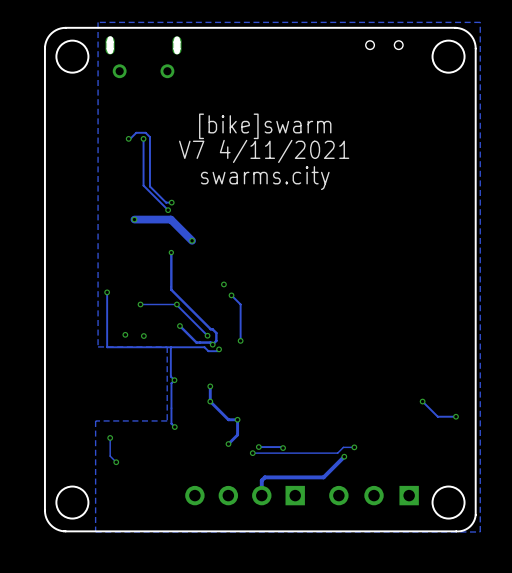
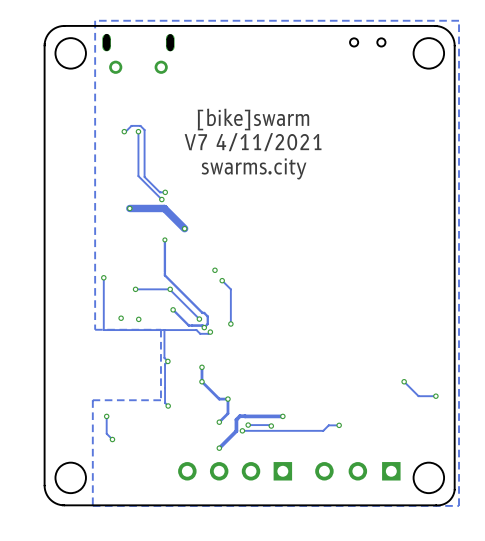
track: none -> (282, 416) (239, 416) (236, 419) (236, 431) (219, 448)
track: (344, 456) (323, 477) (264, 477) (261, 480) (261, 495) -> none
via position: (344, 456) -> (282, 416)
via: none -> (219, 448)

